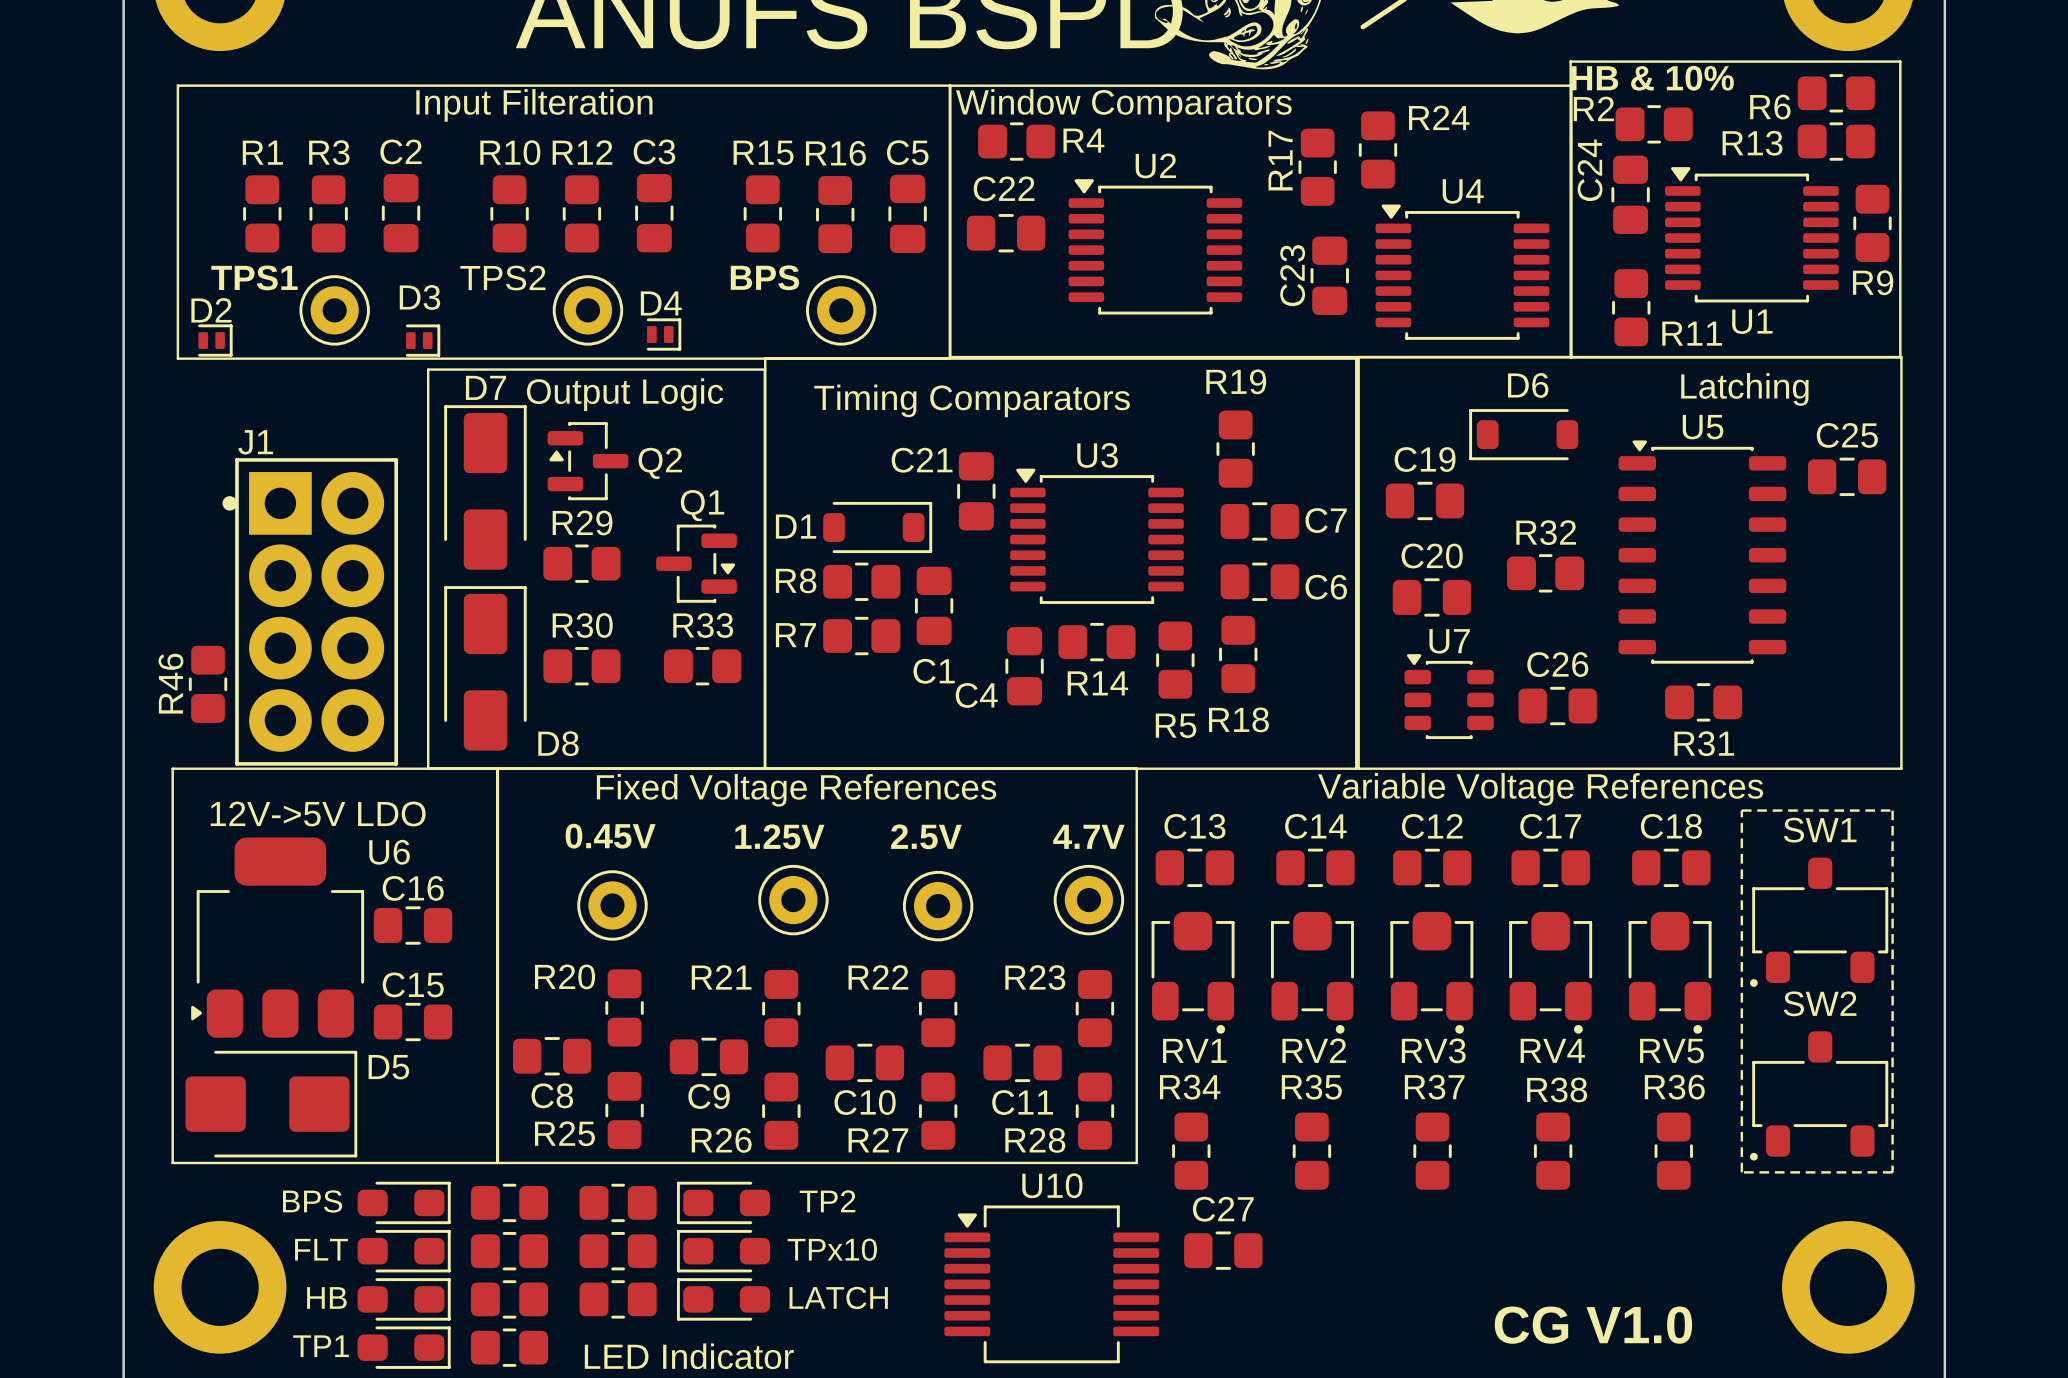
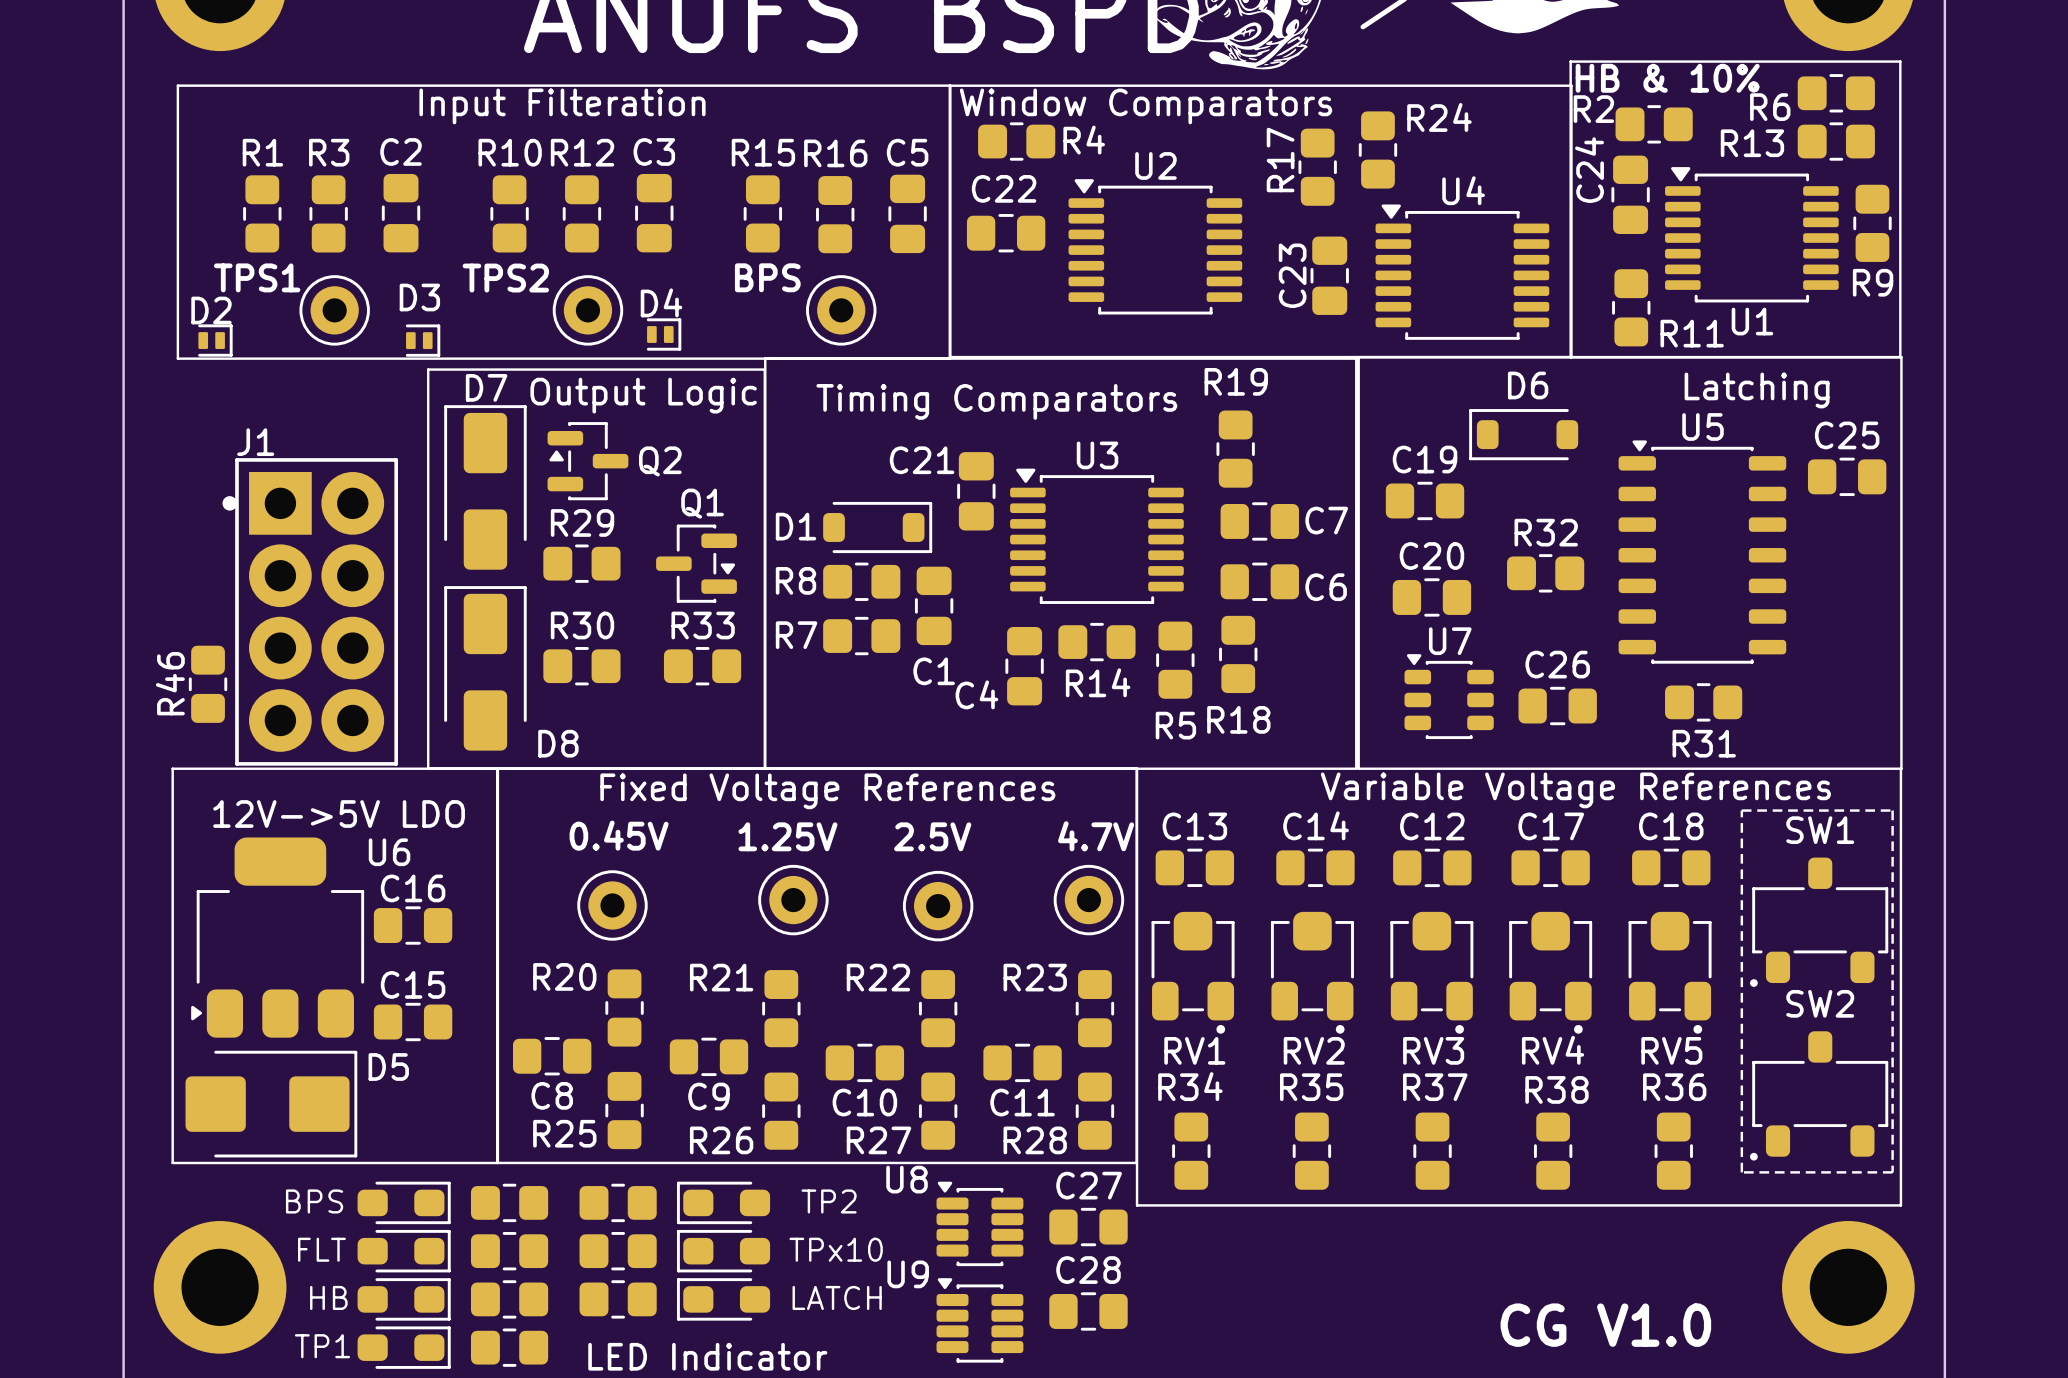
line: none -> (1137, 768) (1137, 1205) (1900, 1205) (1900, 768)
U8: none -> (979, 1223)
C27 position: (1223, 1250) -> (1088, 1227)
U10: (1051, 1284) -> none
C28: none -> (1088, 1311)
U9: none -> (979, 1320)

